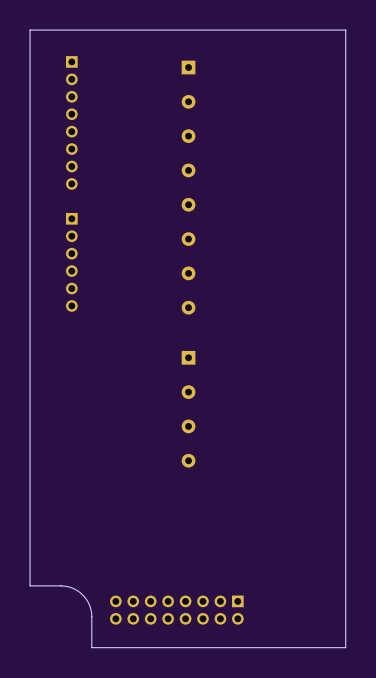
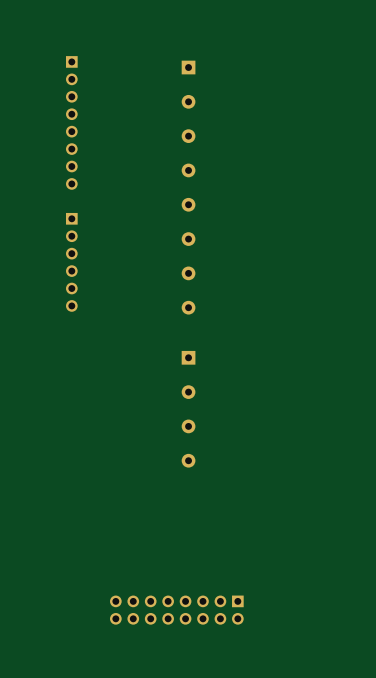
board edge: (345, 30) (345, 647) (91, 647) (91, 609) (82, 594) (67, 586) (30, 585) (30, 30) (345, 30) -> none

